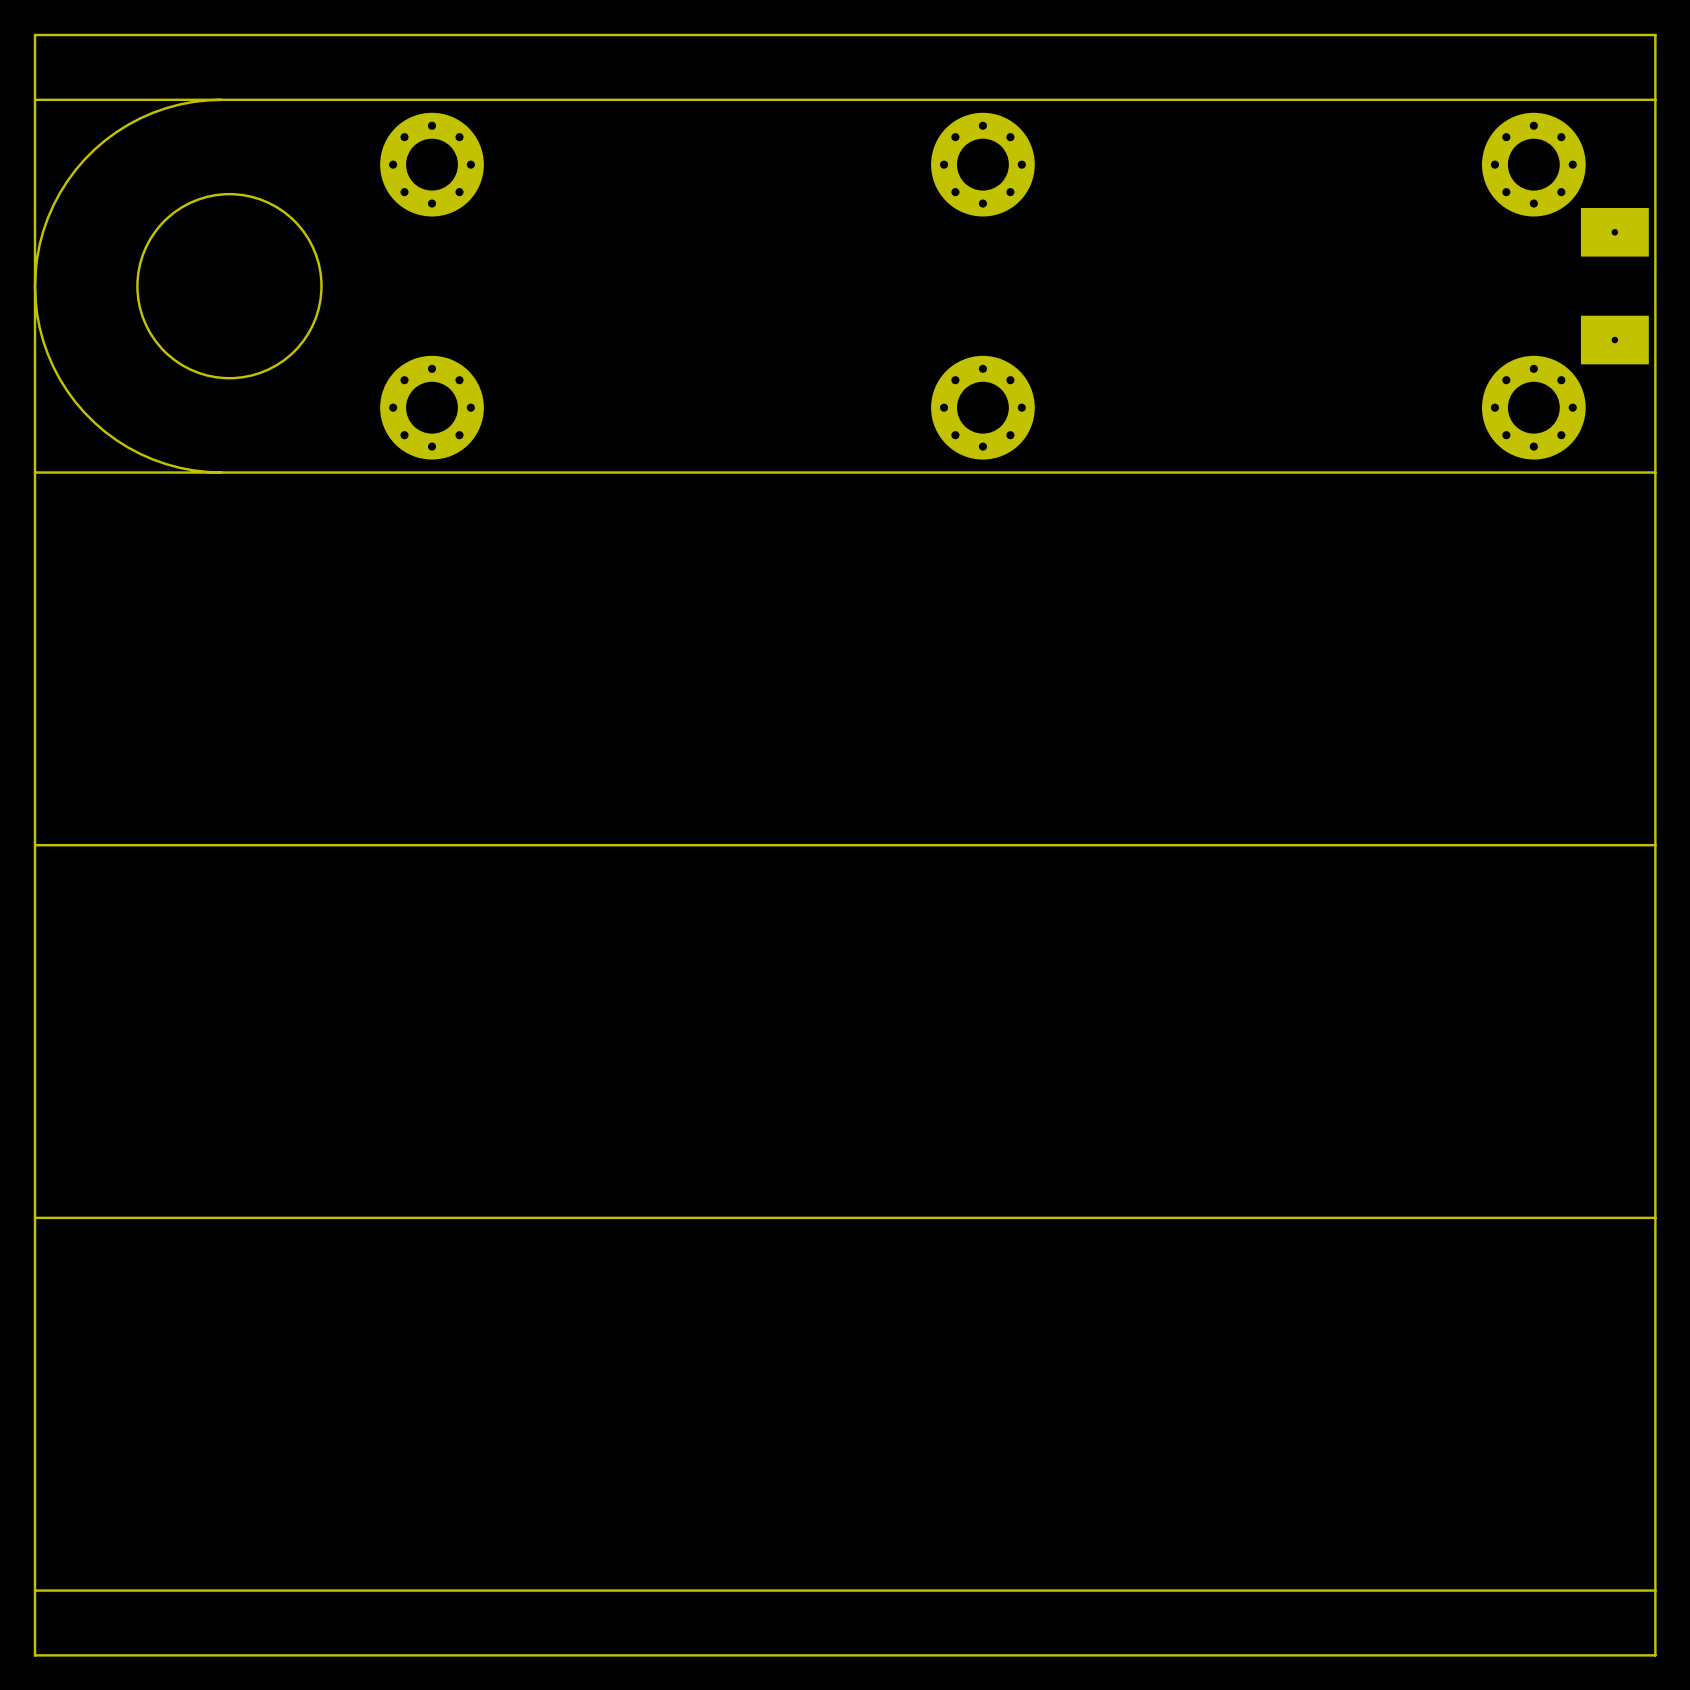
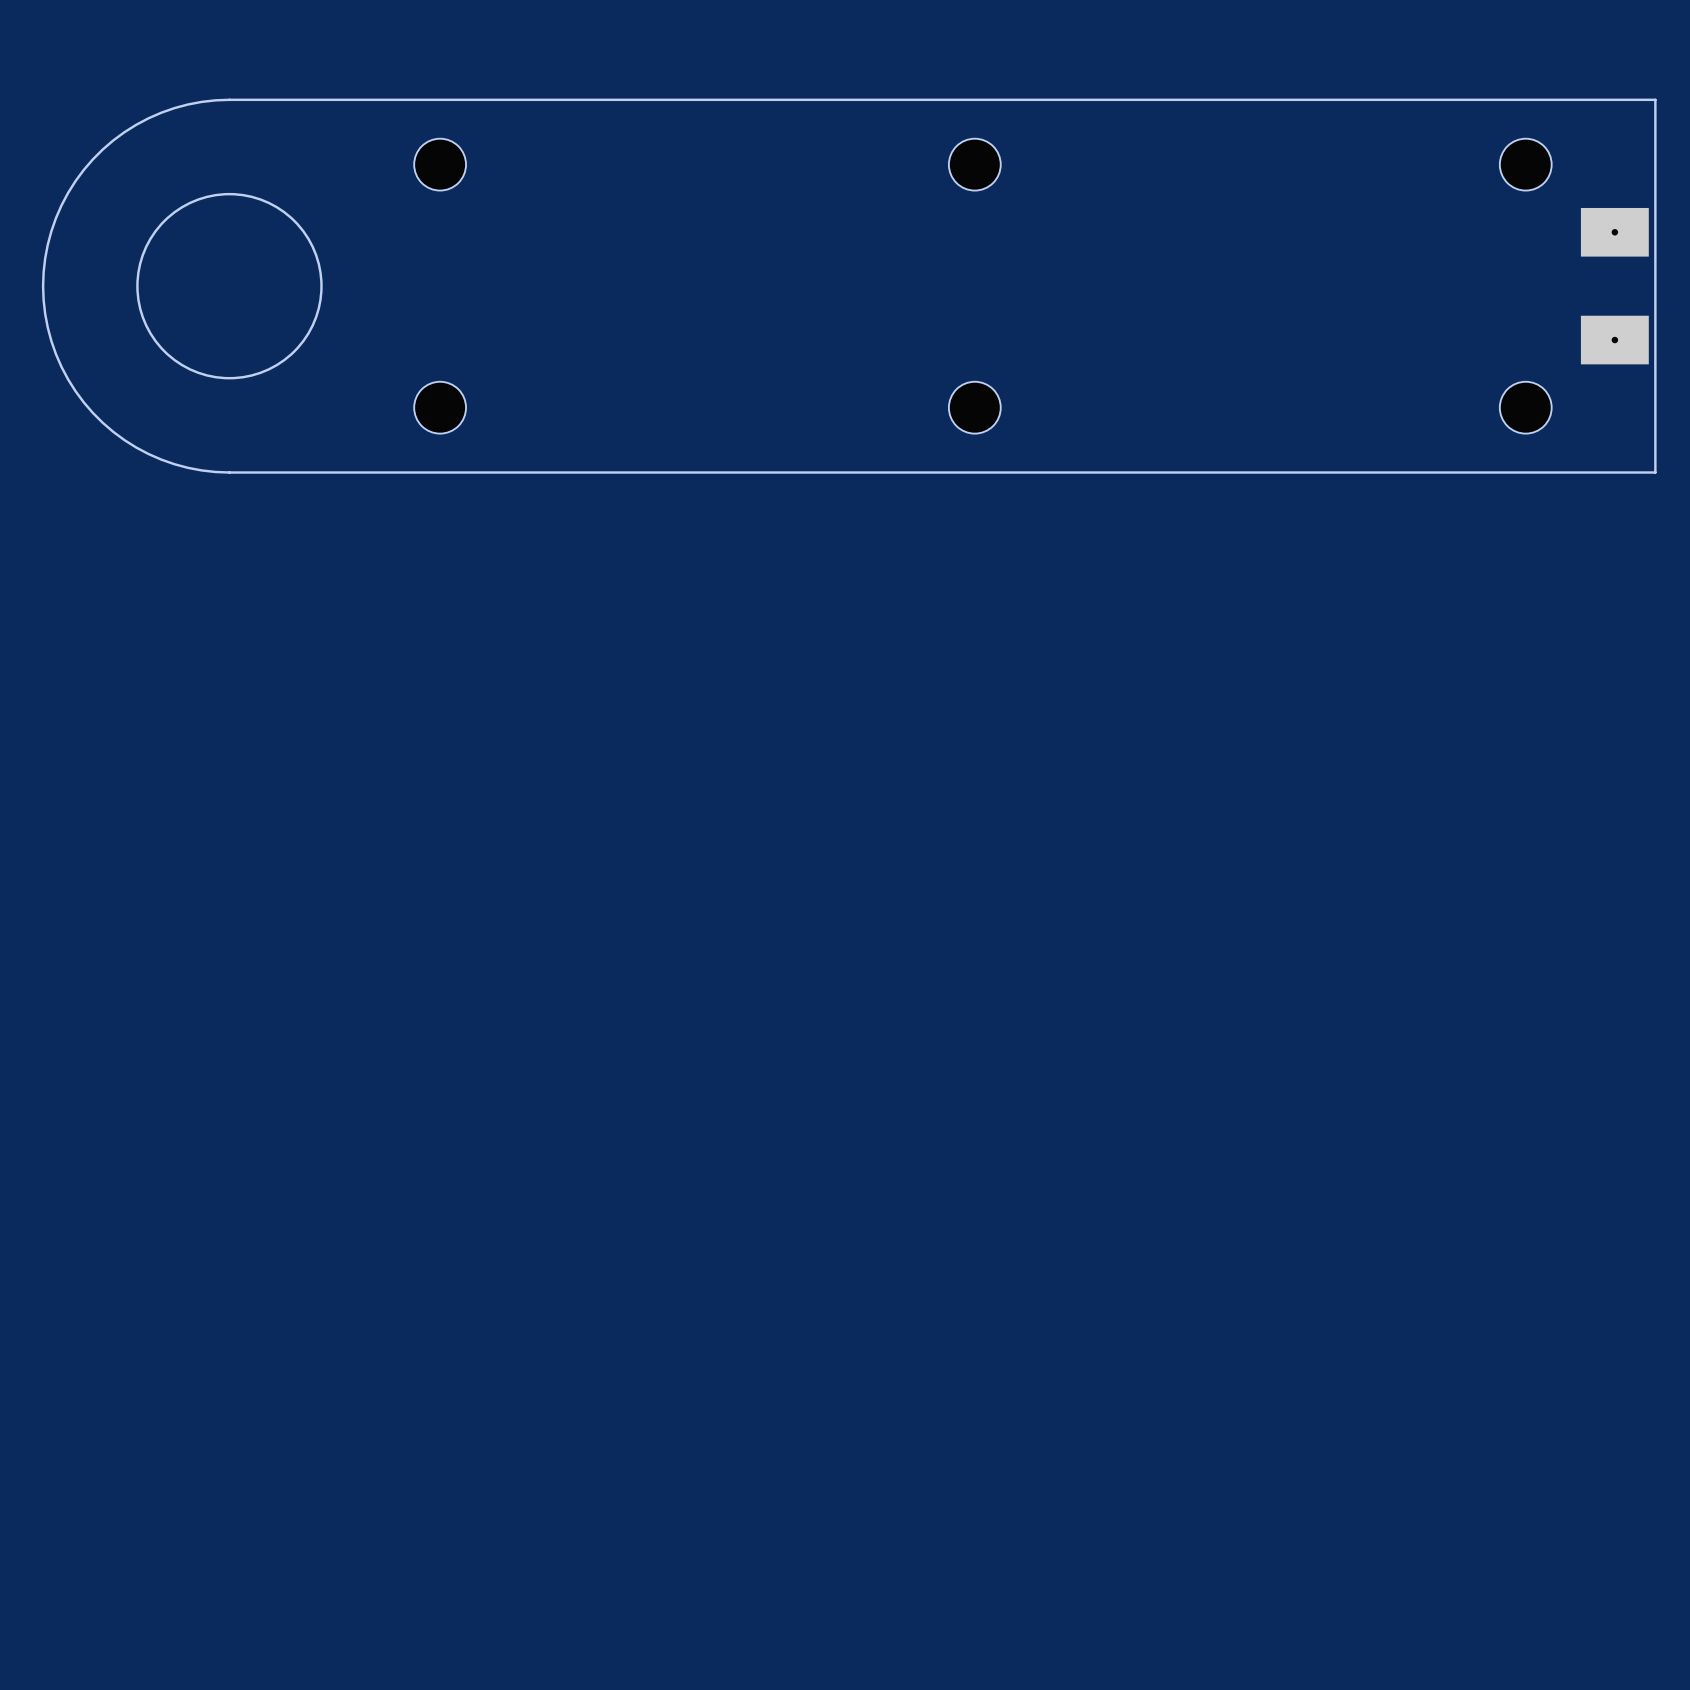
board edge: (221, 99) (179, 104) (140, 118) (116, 132) (84, 159) (59, 192) (47, 218) (37, 258) (35, 286) (37, 313) (47, 354) (59, 379) (84, 412) (105, 431) (140, 454) (179, 467) (221, 472) -> none
board edge: (229, 99) (35, 99) -> (229, 99) (187, 104) (148, 118) (124, 132) (92, 159) (68, 192) (55, 218) (45, 258) (43, 286) (45, 313) (55, 354) (68, 379) (92, 412) (113, 431) (148, 454) (187, 467) (229, 472)
board edge: (1655, 99) (1655, 35) (35, 35) (35, 1655) (1655, 1655) (1655, 472) -> none
part footprint: [380, 112, 484, 217] -> [414, 138, 467, 191]
part footprint: [931, 112, 1035, 217] -> [948, 138, 1001, 191]
part footprint: [1482, 112, 1586, 217] -> [1499, 138, 1552, 191]
part footprint: [380, 355, 484, 460] -> [414, 381, 467, 434]
part footprint: [931, 355, 1035, 460] -> [948, 381, 1001, 434]
part footprint: [1482, 355, 1586, 460] -> [1499, 381, 1552, 434]
board edge: (229, 472) (35, 472) -> none
board edge: (1655, 845) (35, 845) -> none
board edge: (1655, 1217) (35, 1217) -> none
board edge: (1655, 1590) (35, 1590) -> none

